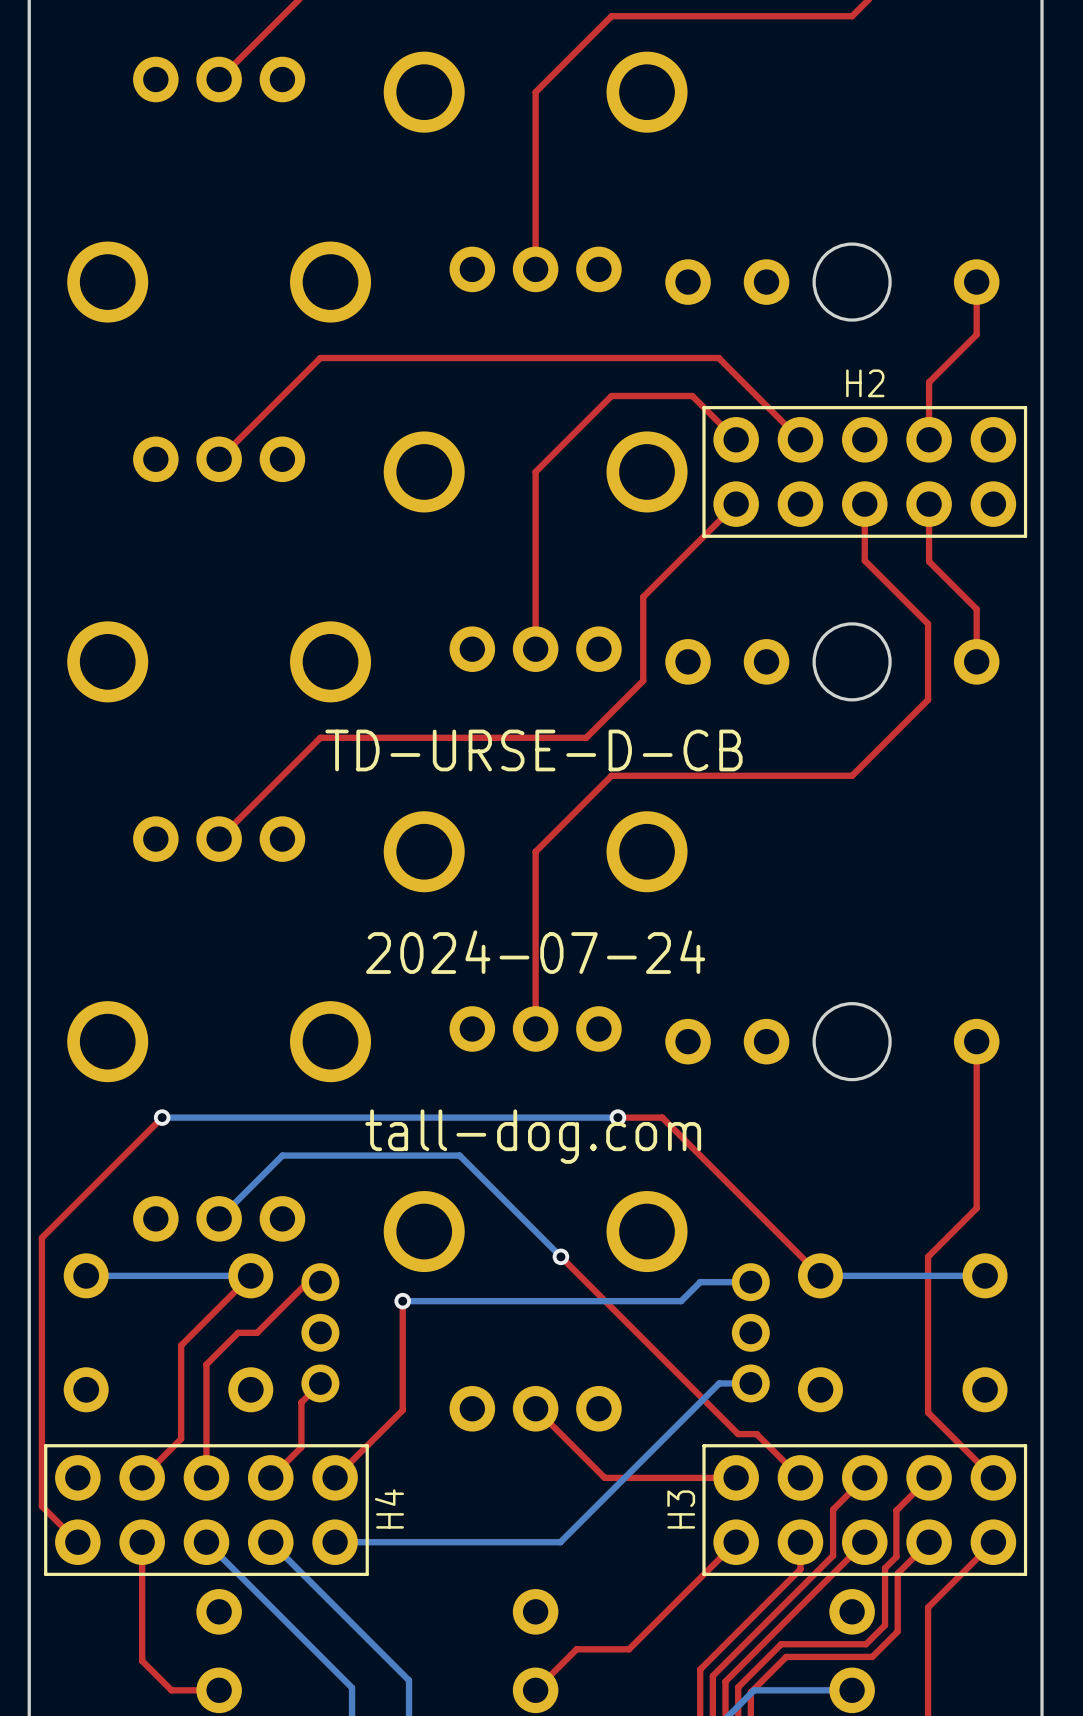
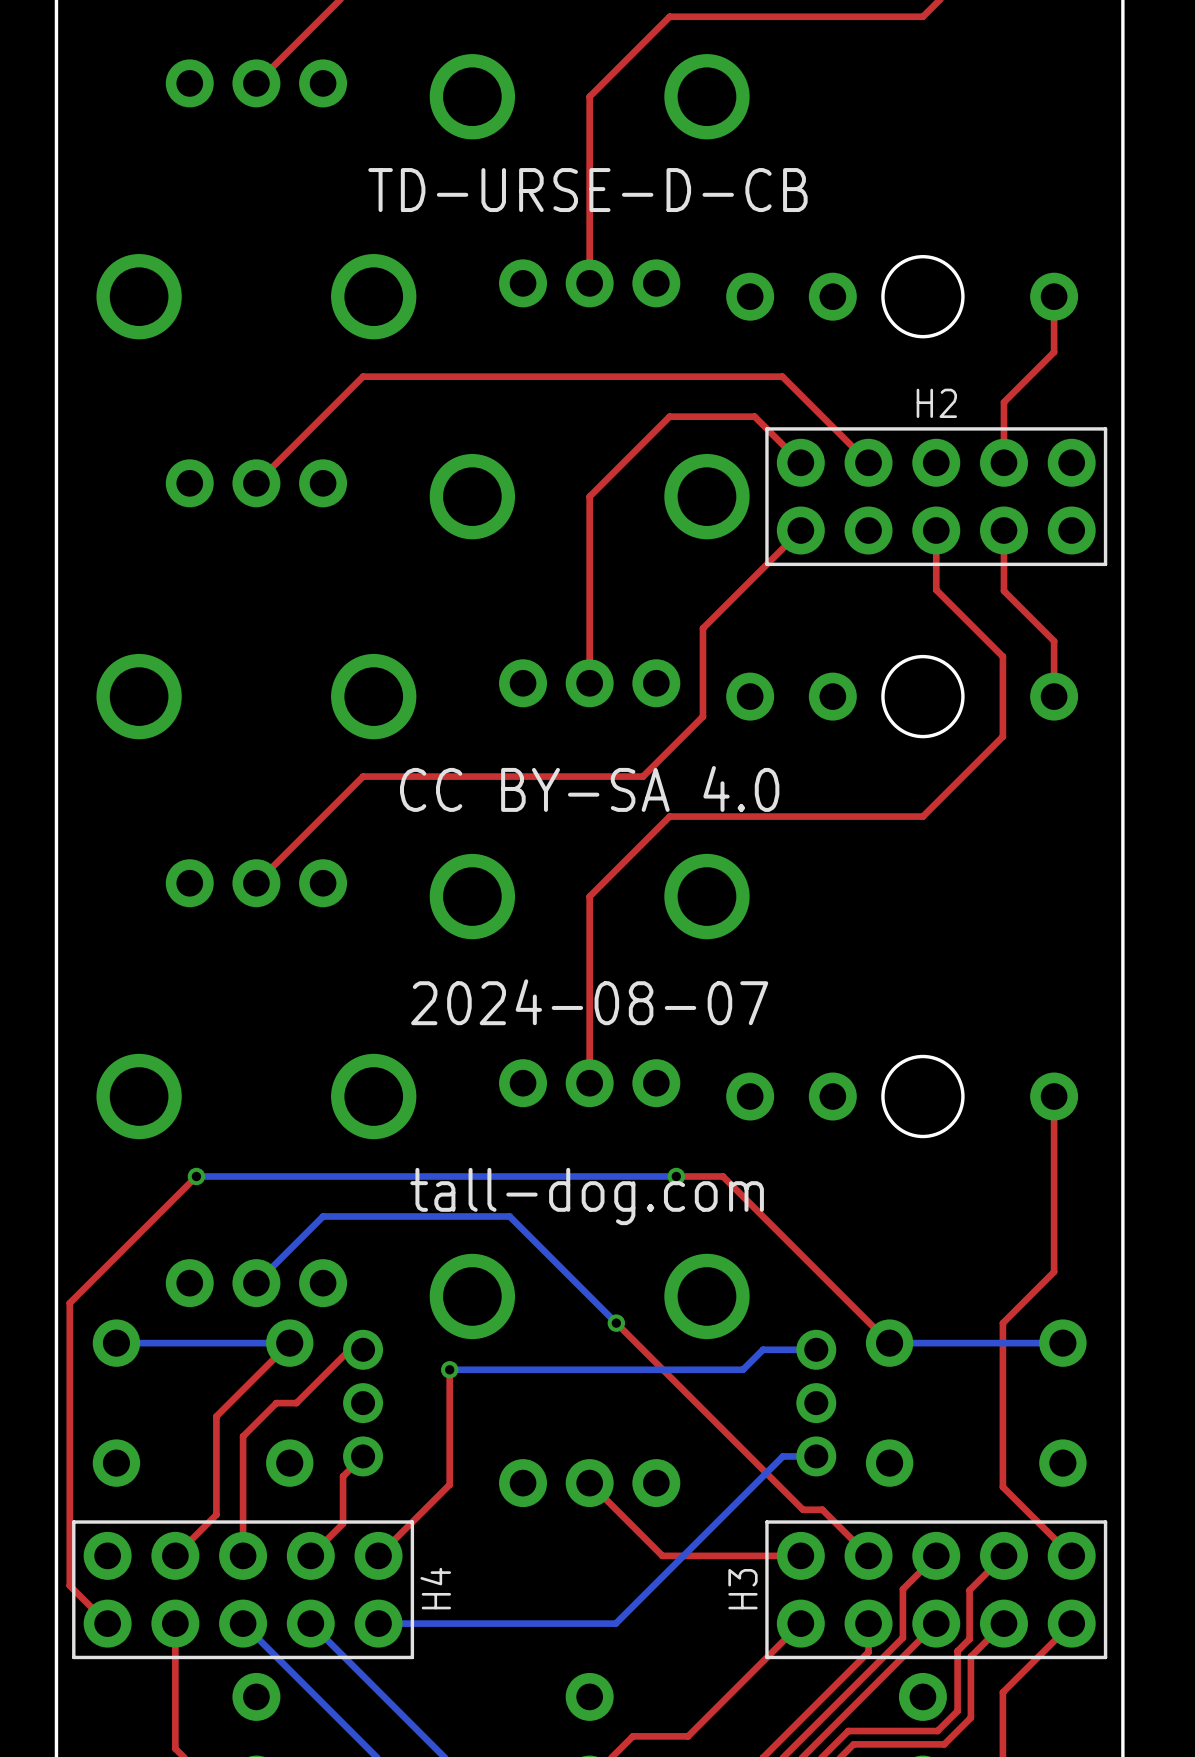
text: none -> TD-URSE-D-CB (587, 190)
text: TD-URSE-D-CB (534, 750) -> CC BY-SA 4.0 (589, 788)
text: 2024-07-24 (535, 952) -> 2024-08-07 (589, 1002)

